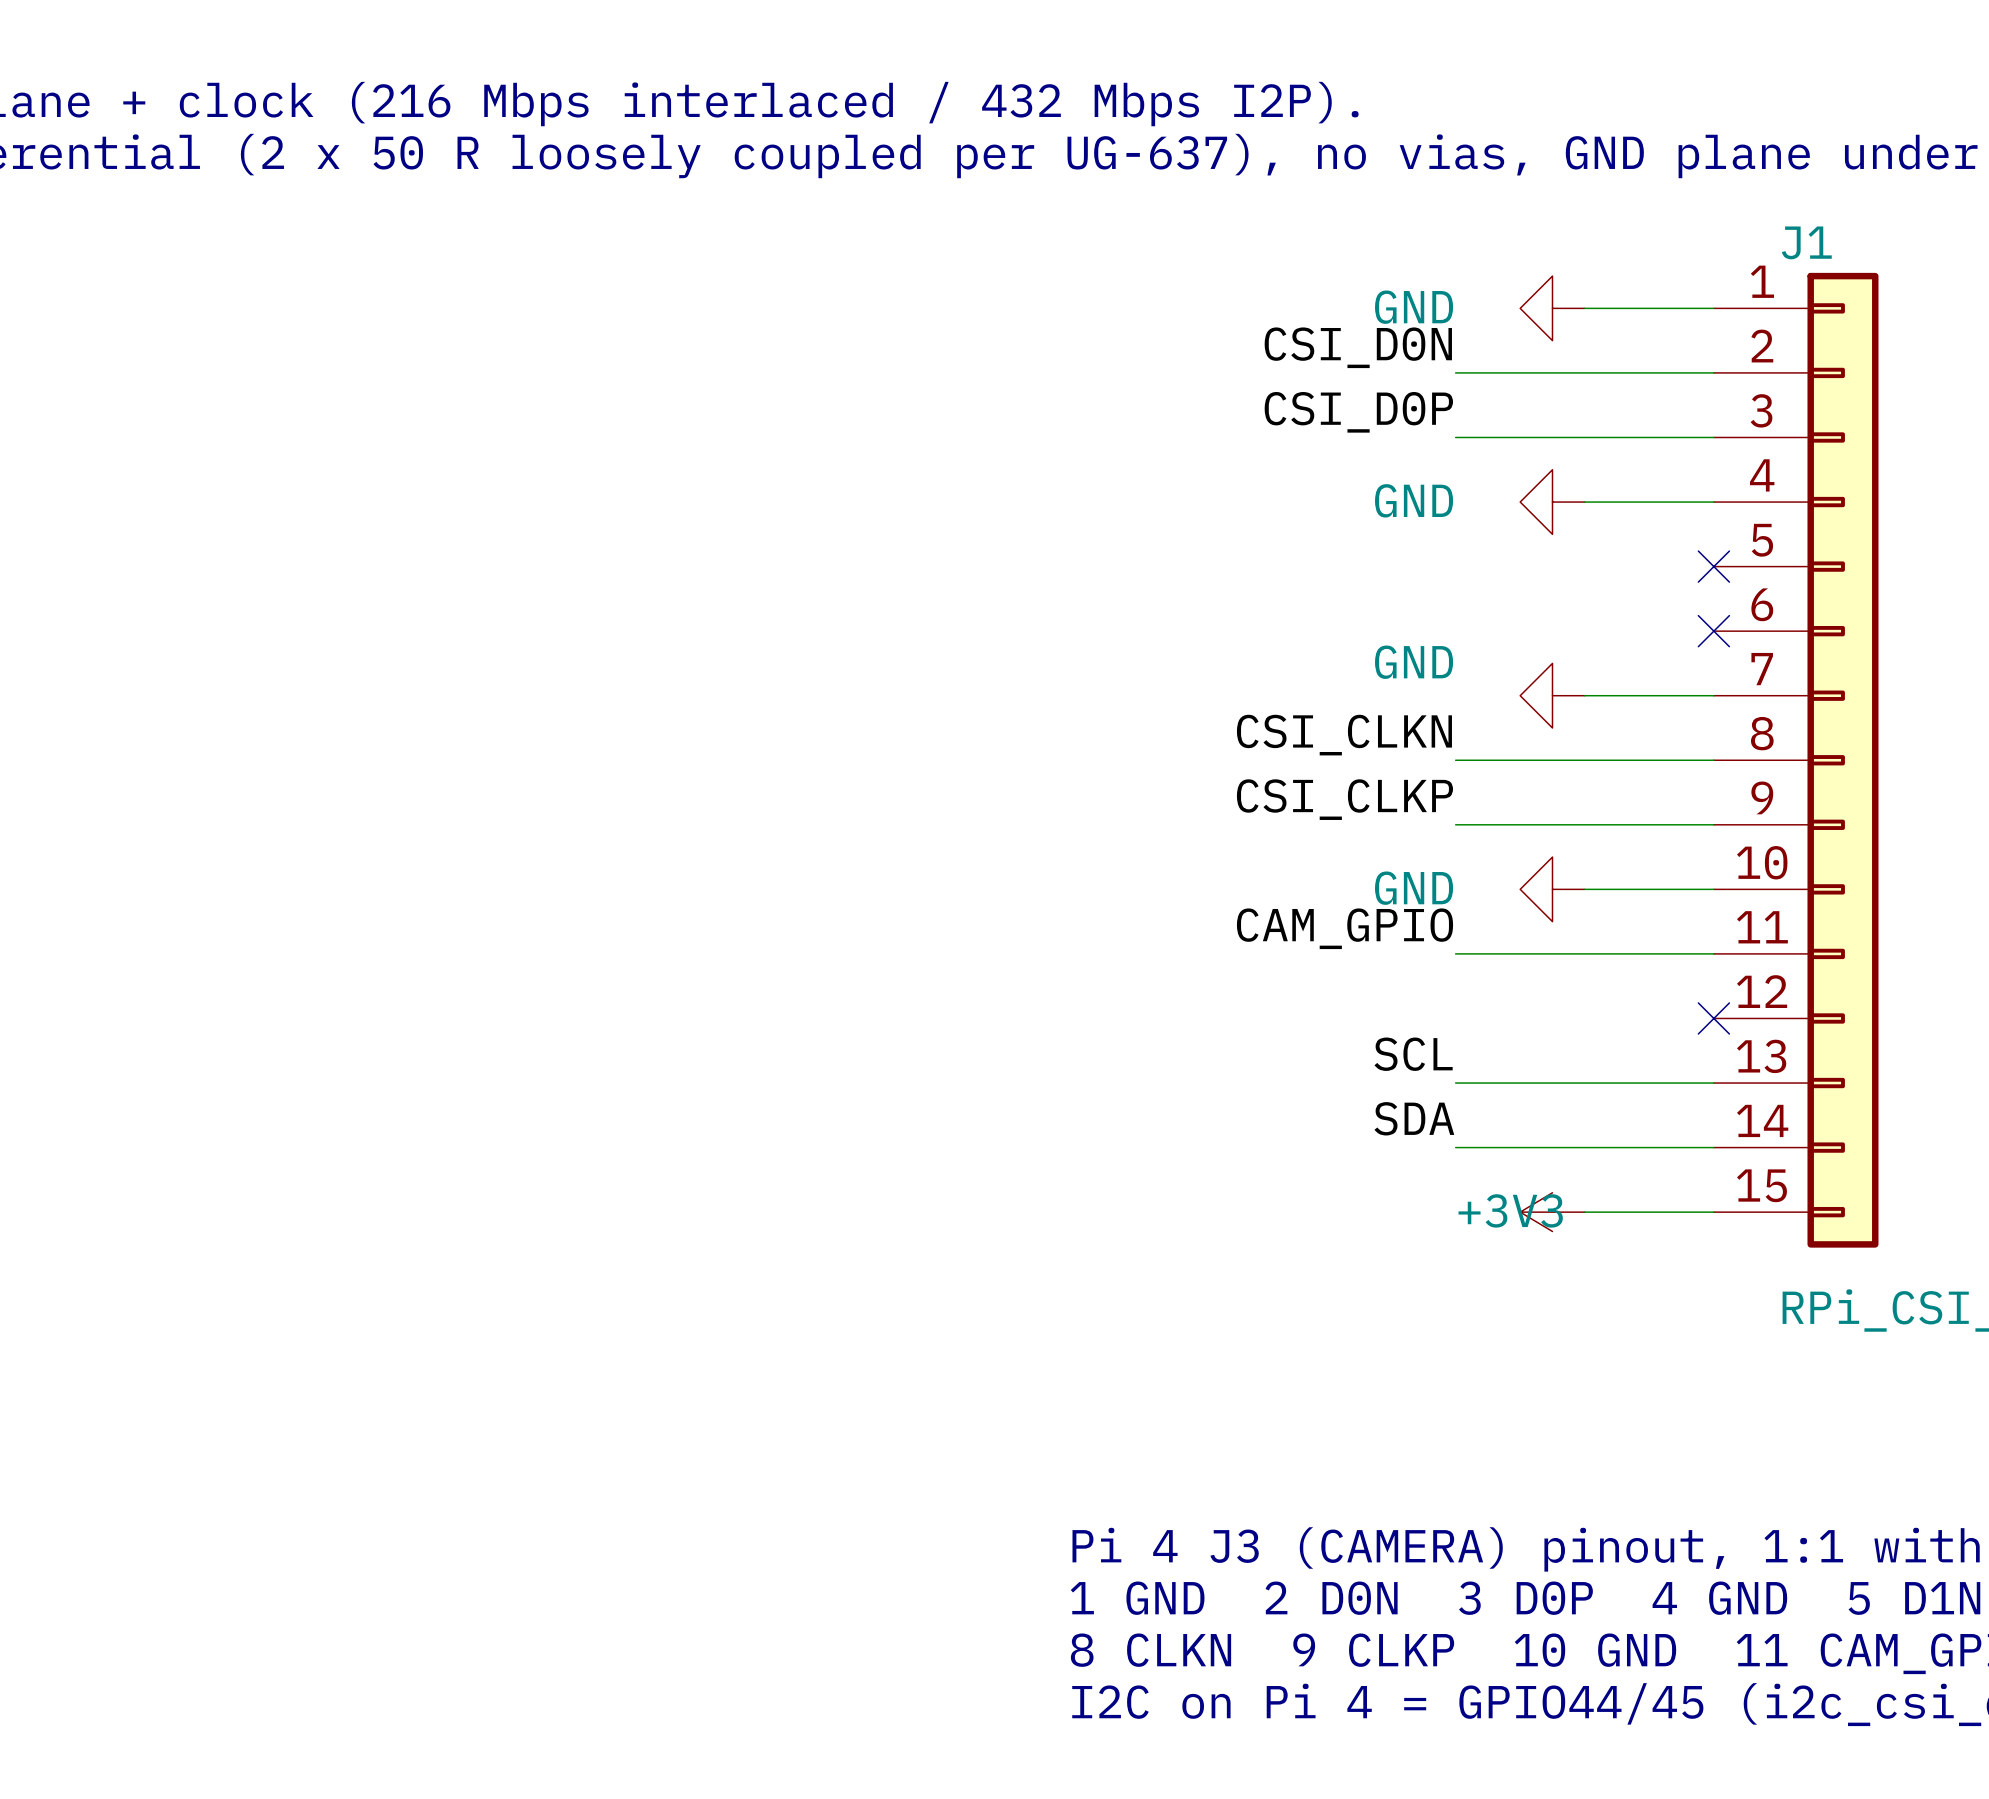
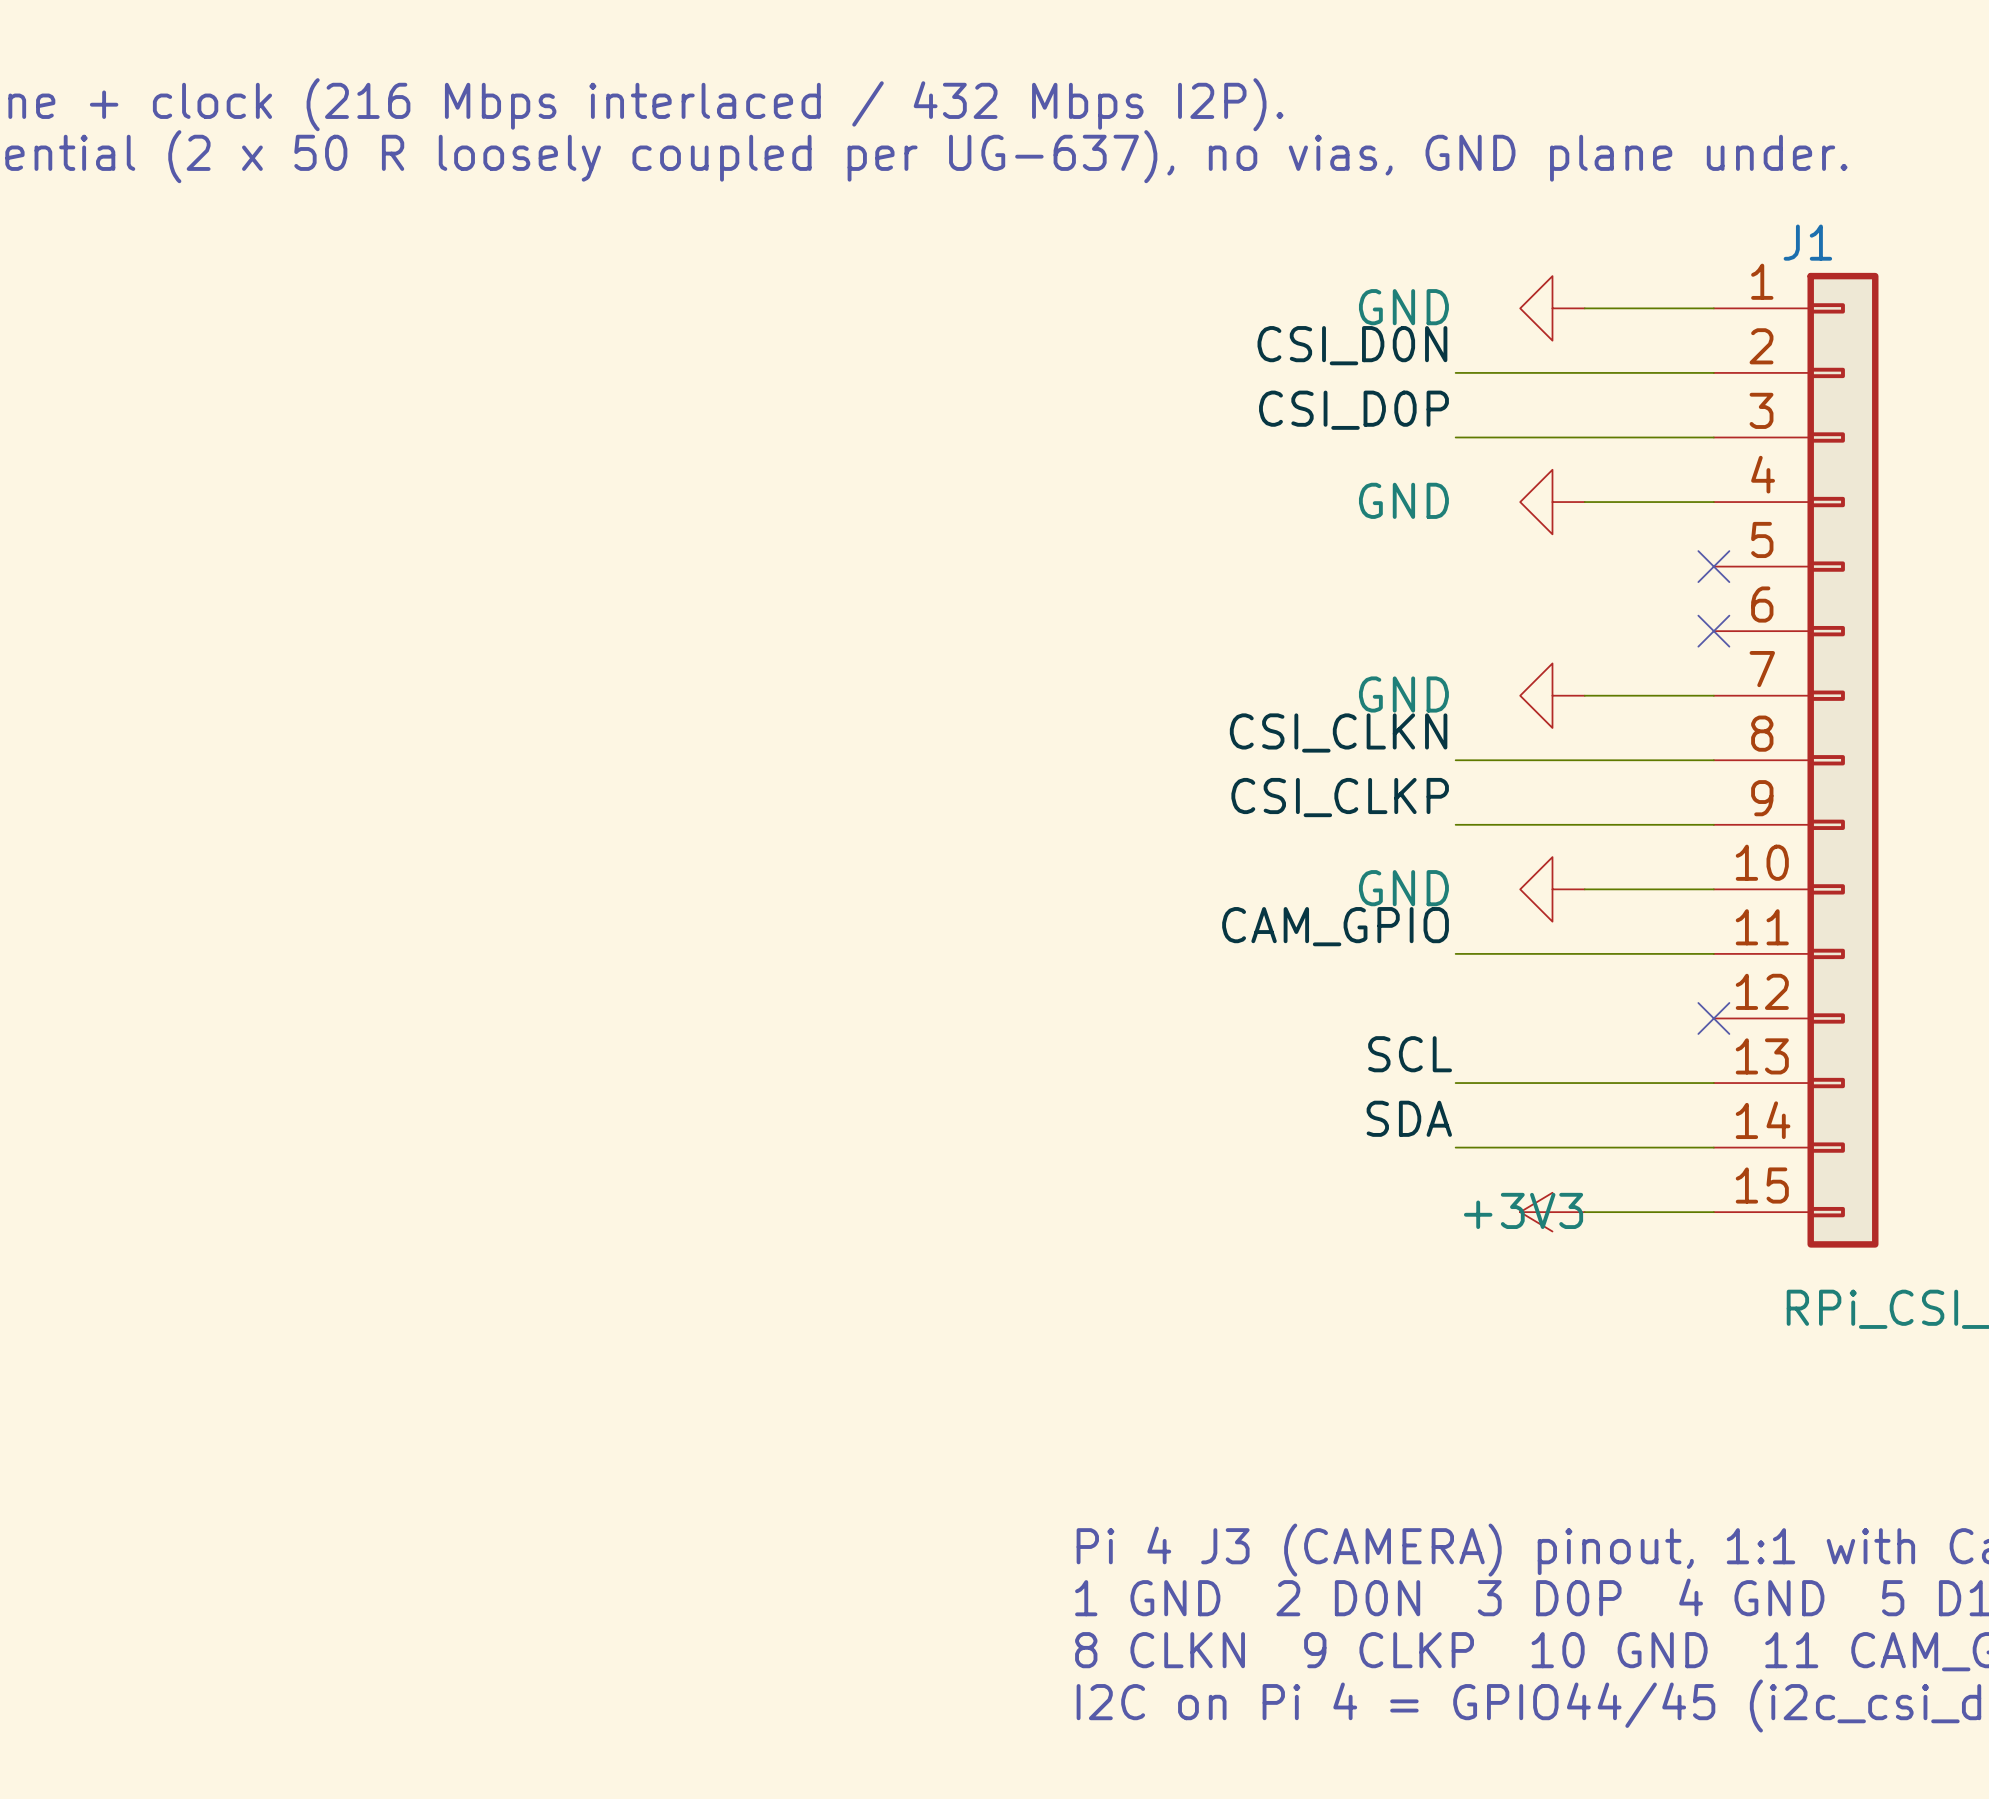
power symbol text position: GND (1414, 662) -> GND (1403, 694)

